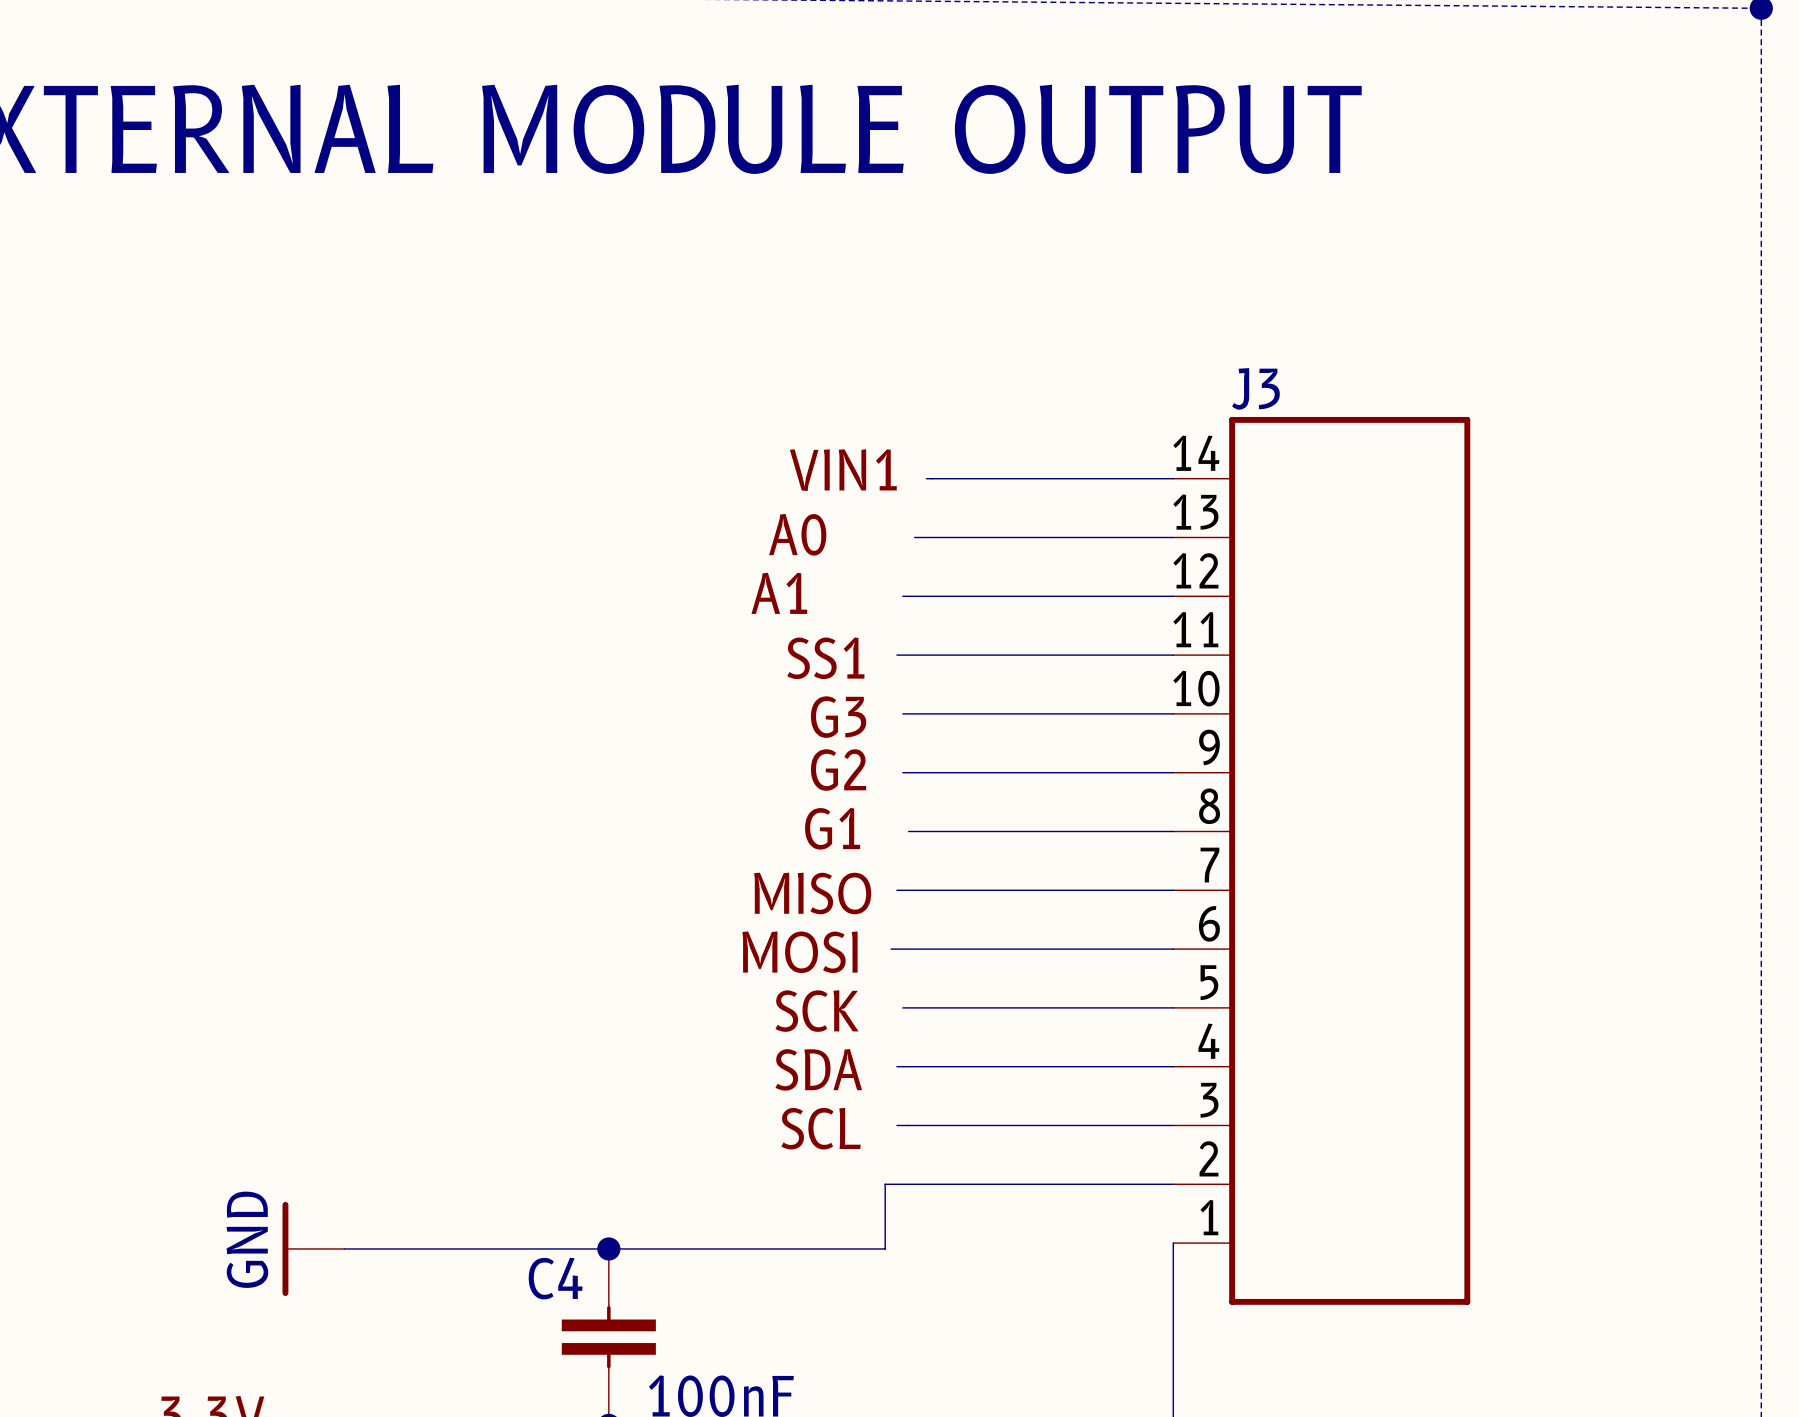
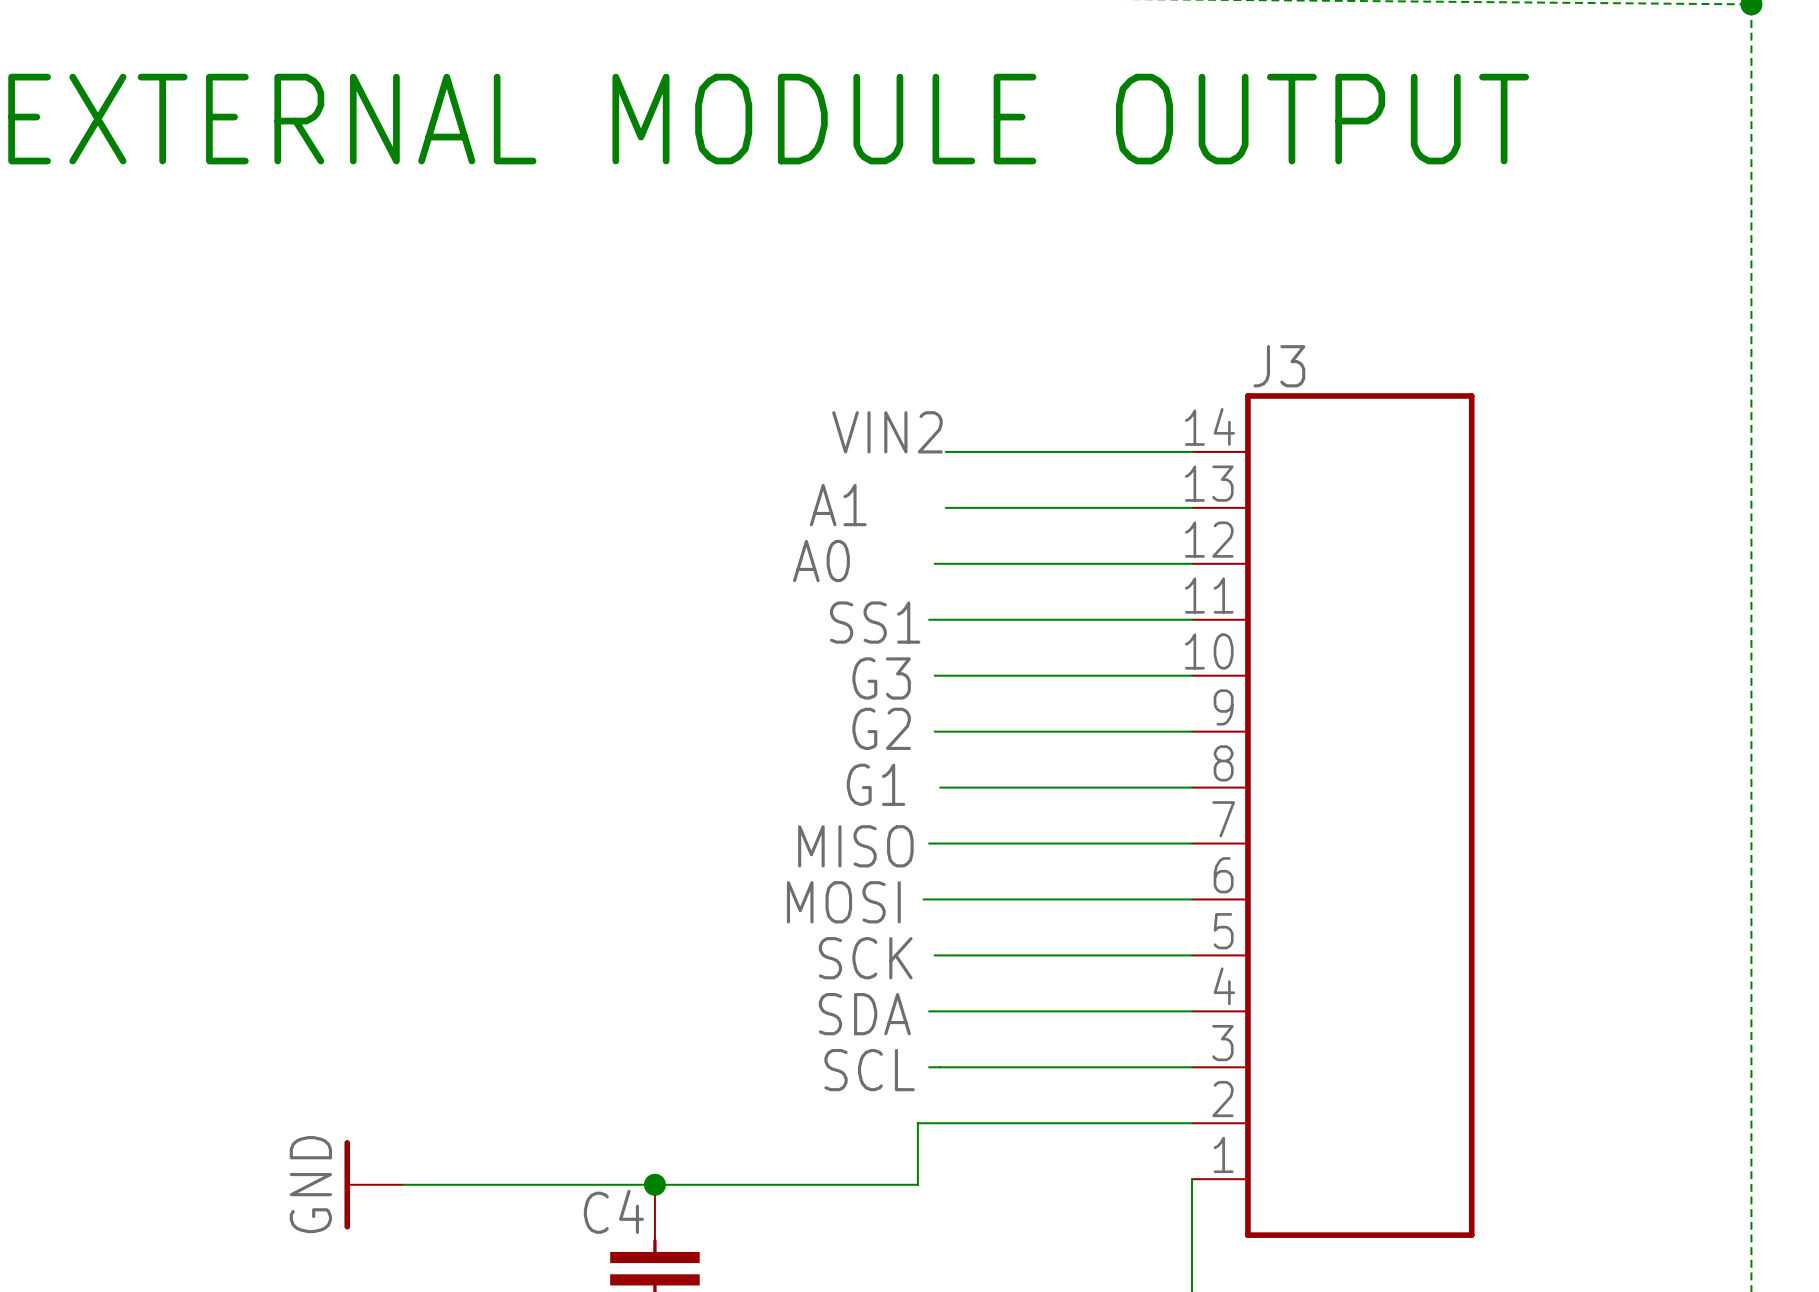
label: VIN1 (843, 470) -> VIN2 (887, 432)
wire: none -> (945, 451) (957, 451)
label: A0 (797, 534) -> A1 (838, 505)
label: A1 (779, 593) -> A0 (821, 561)

